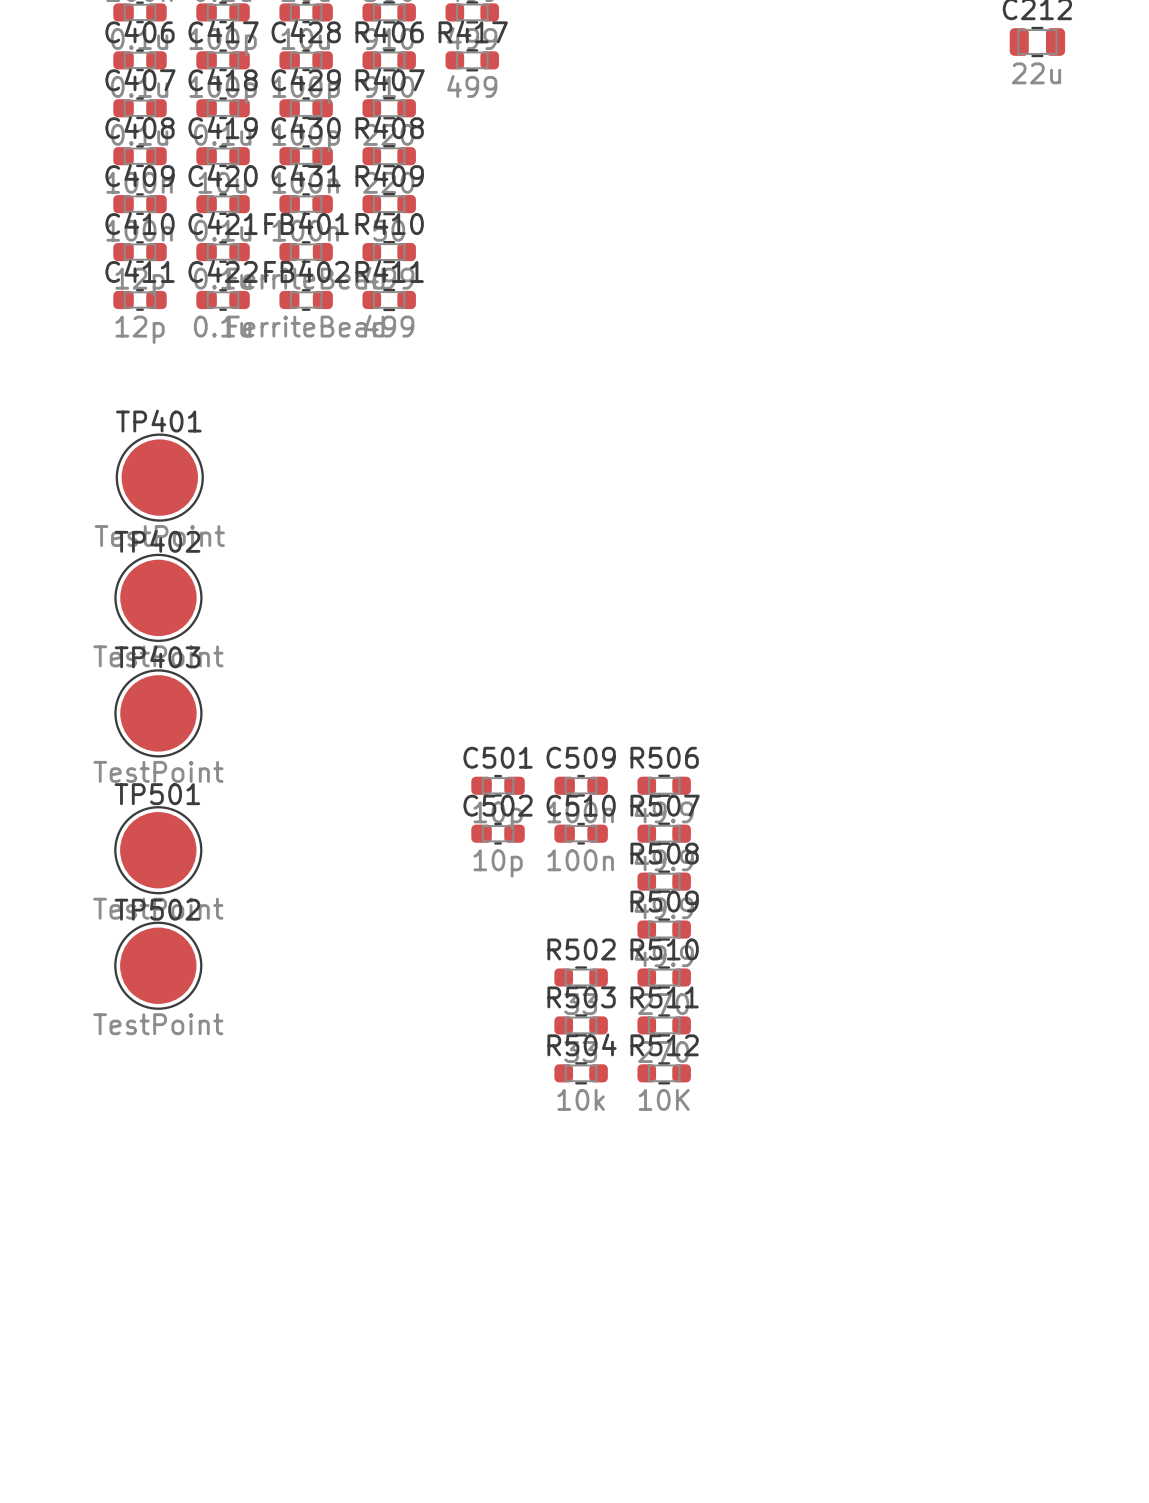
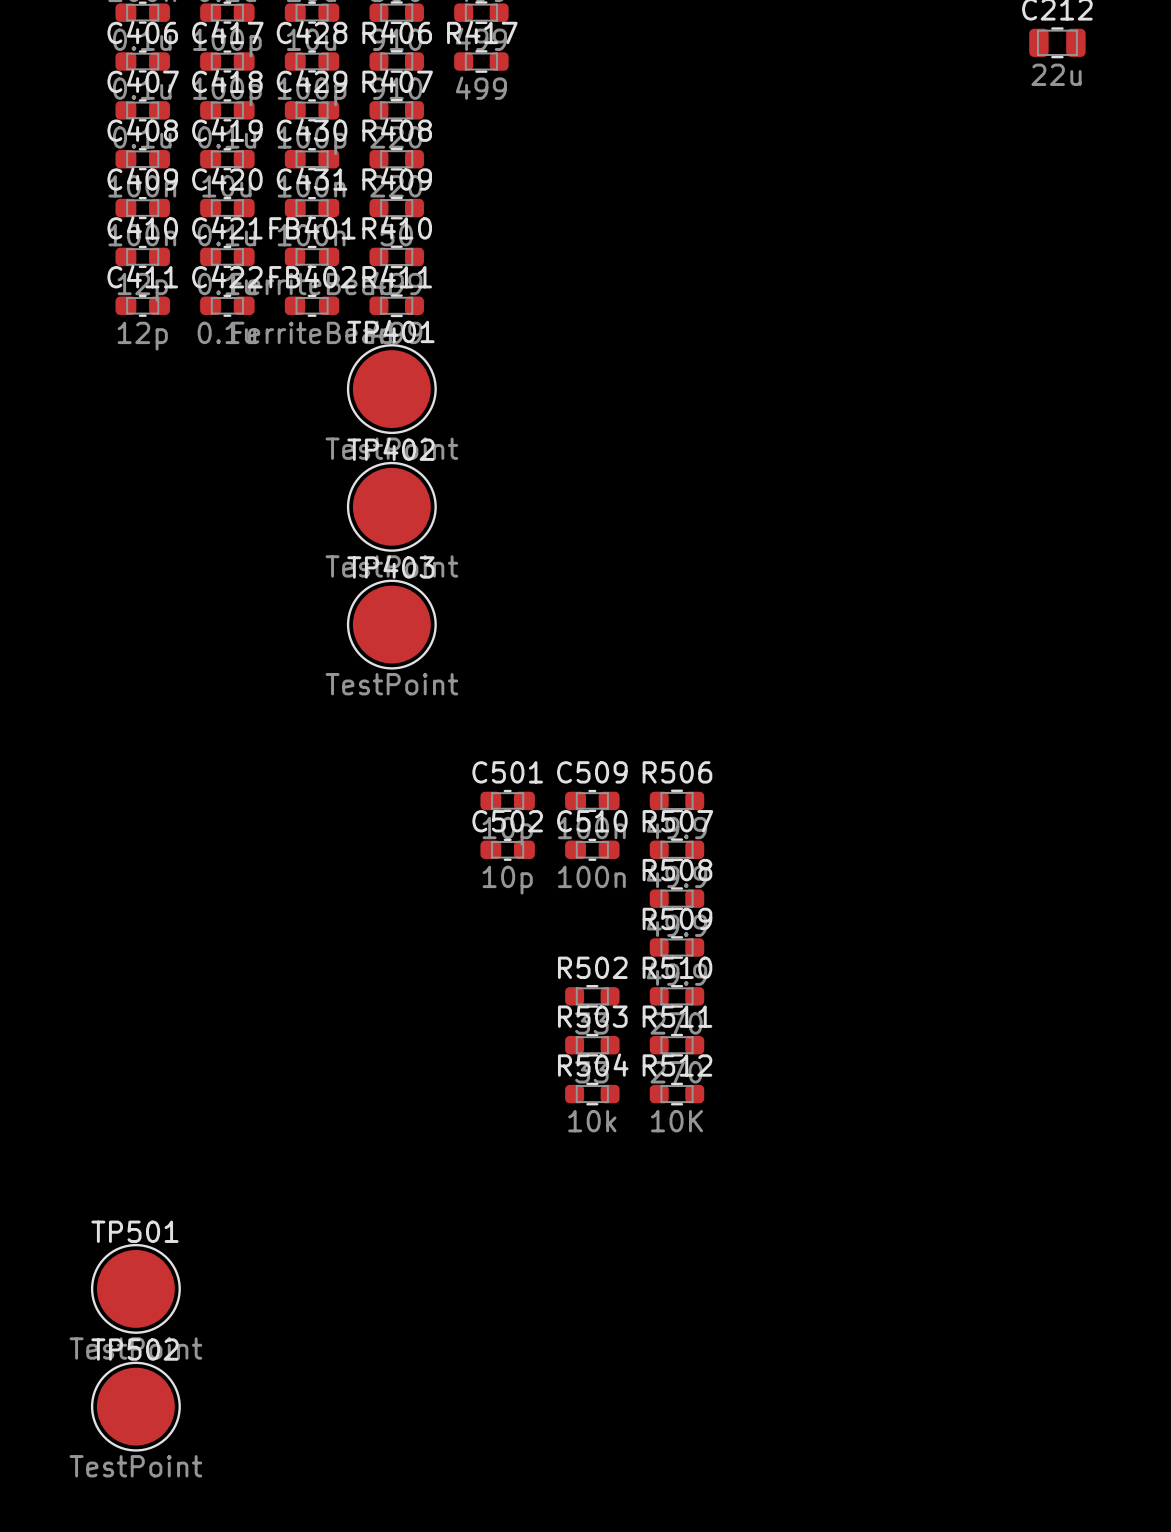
TP401 position: (159, 477) -> (391, 389)
TP402 position: (158, 597) -> (391, 506)
TP403 position: (158, 713) -> (391, 624)
TP501 position: (158, 850) -> (135, 1288)
TP502 position: (158, 965) -> (135, 1406)

